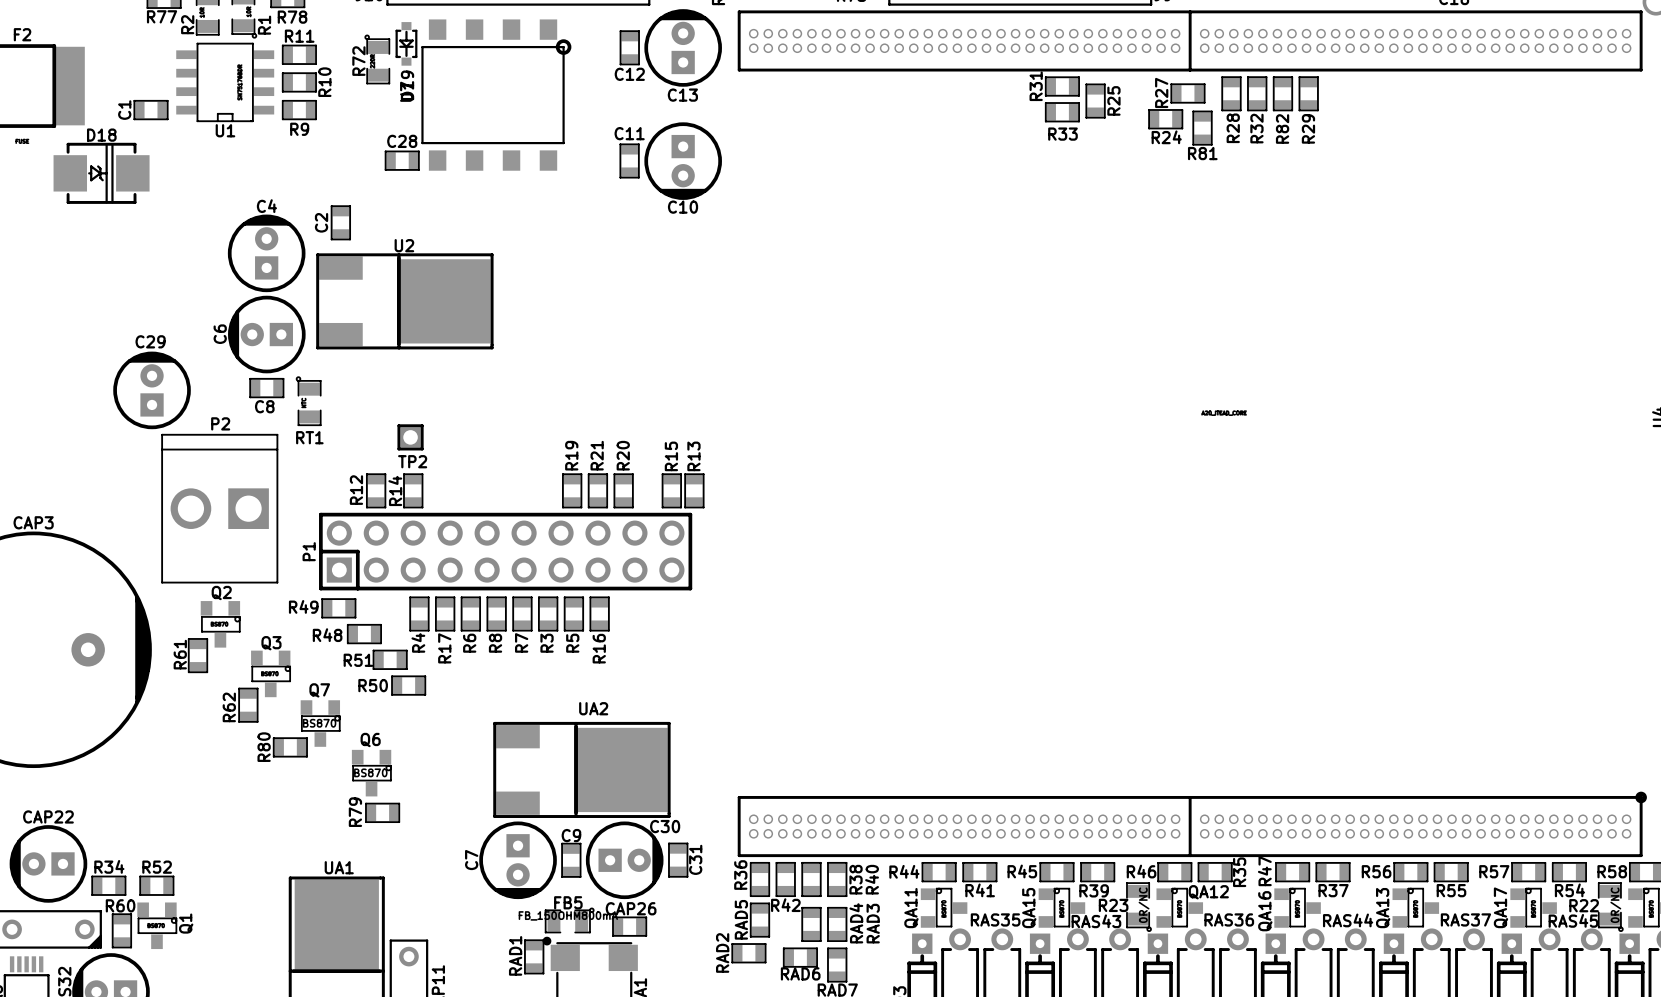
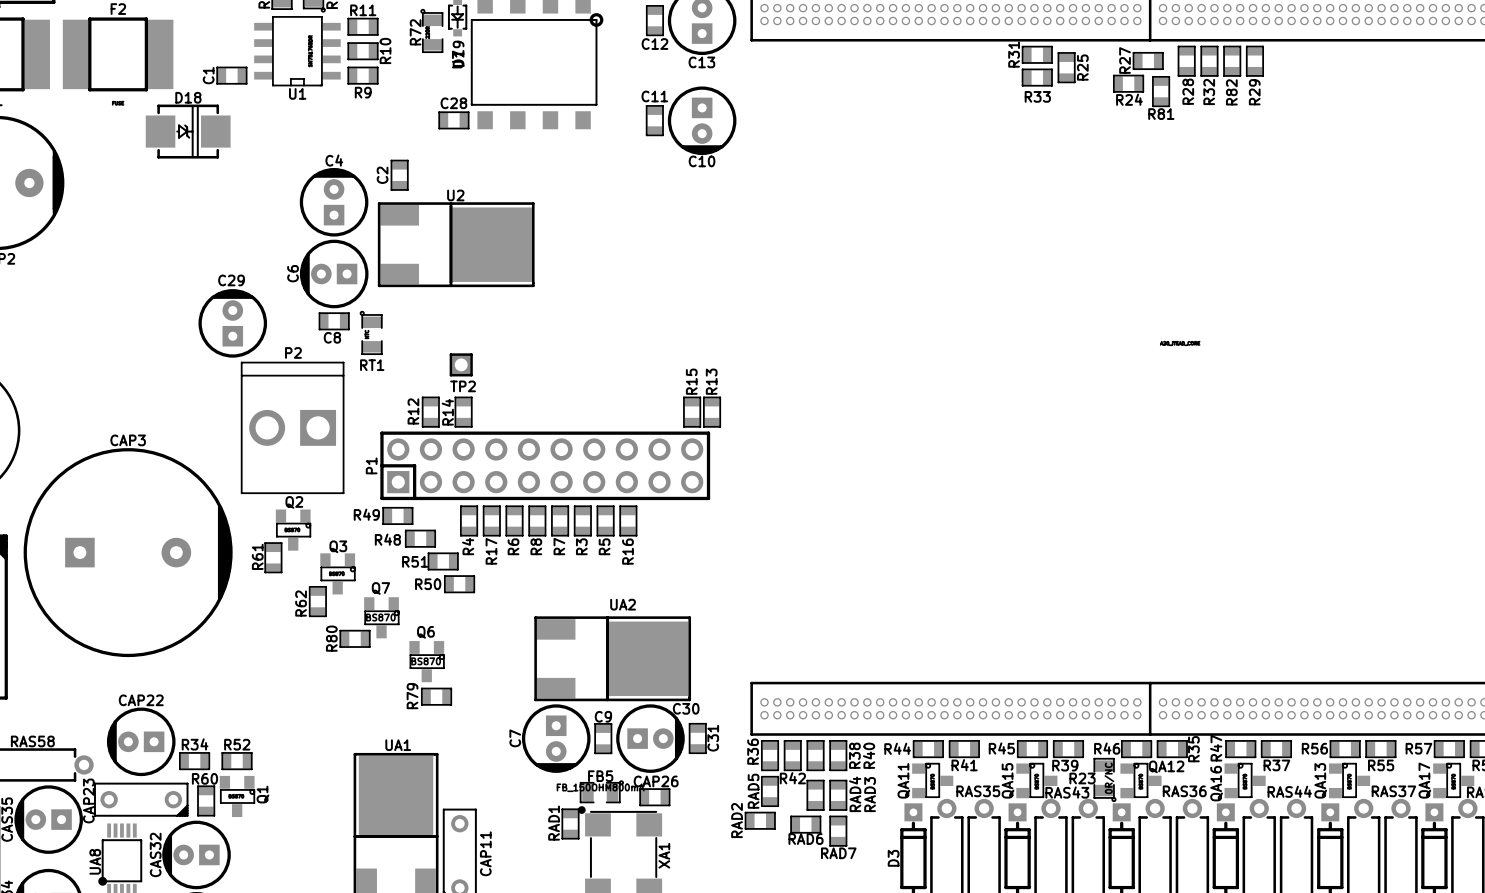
R19: (572, 490) -> none
R21: (597, 490) -> none
R20: (623, 490) -> none

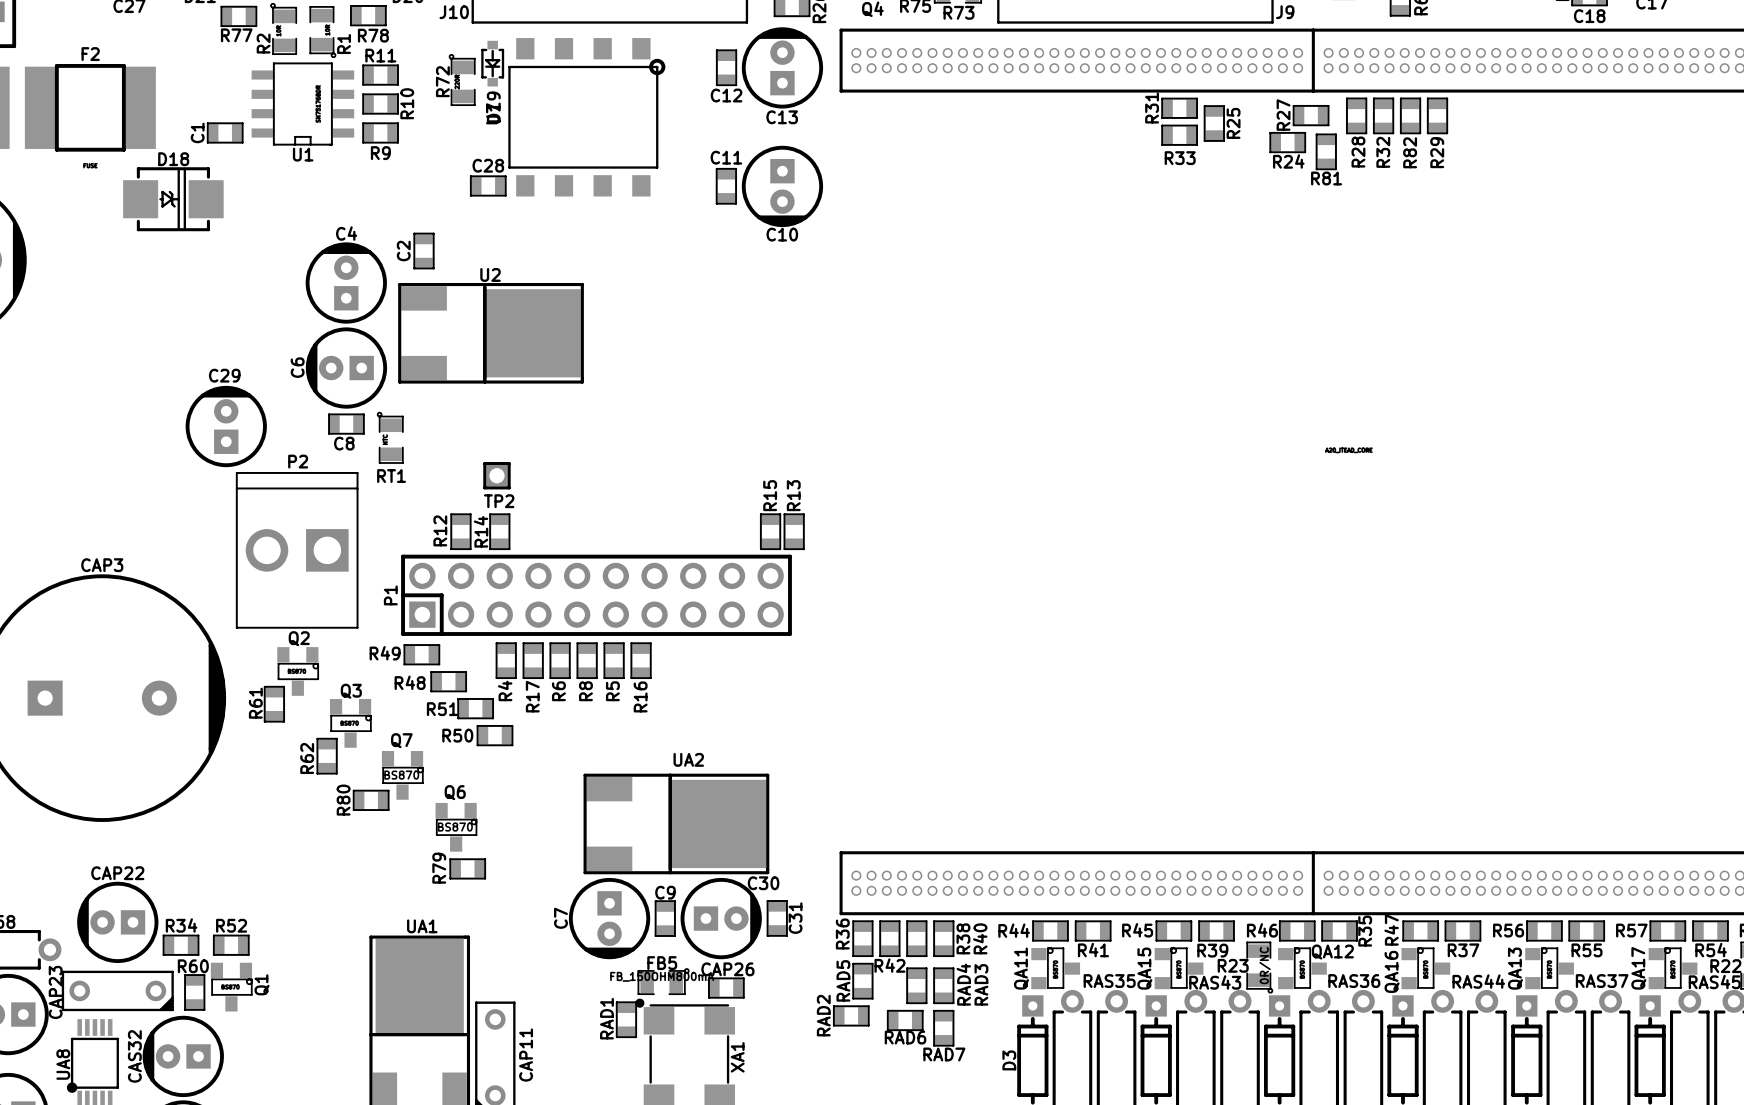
R5: (605, 520) -> none
R16: (628, 520) -> none
R7 name: R7 (559, 546) -> R5 (612, 691)
R3 name: R3 (581, 546) -> R16 (640, 696)

